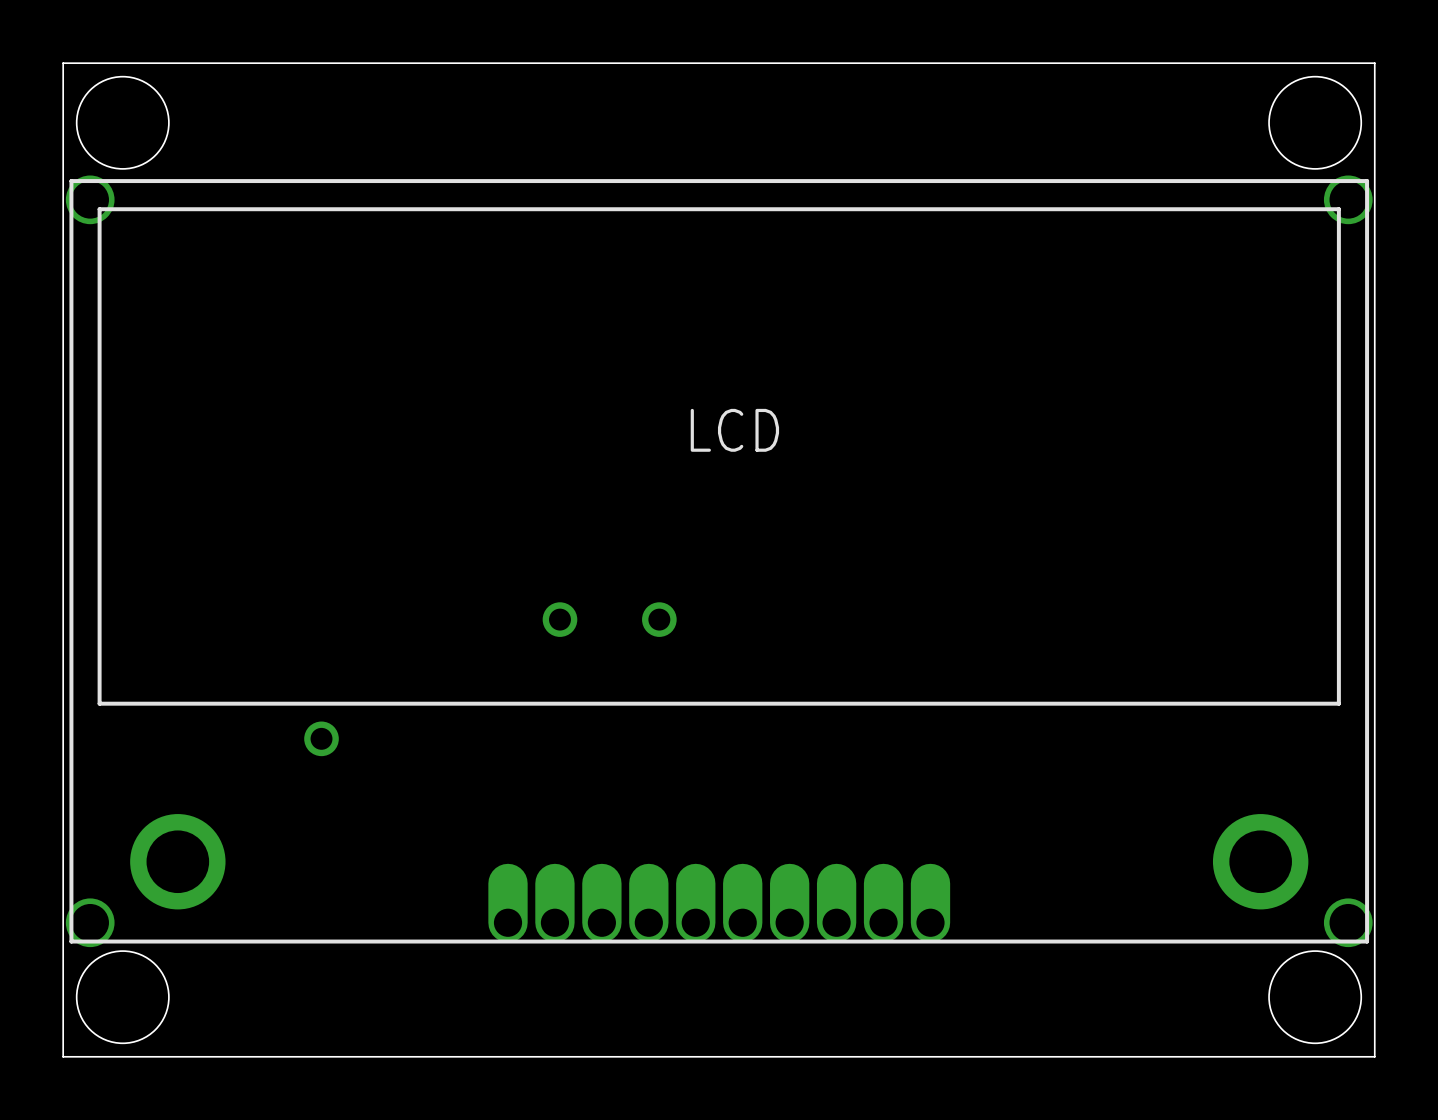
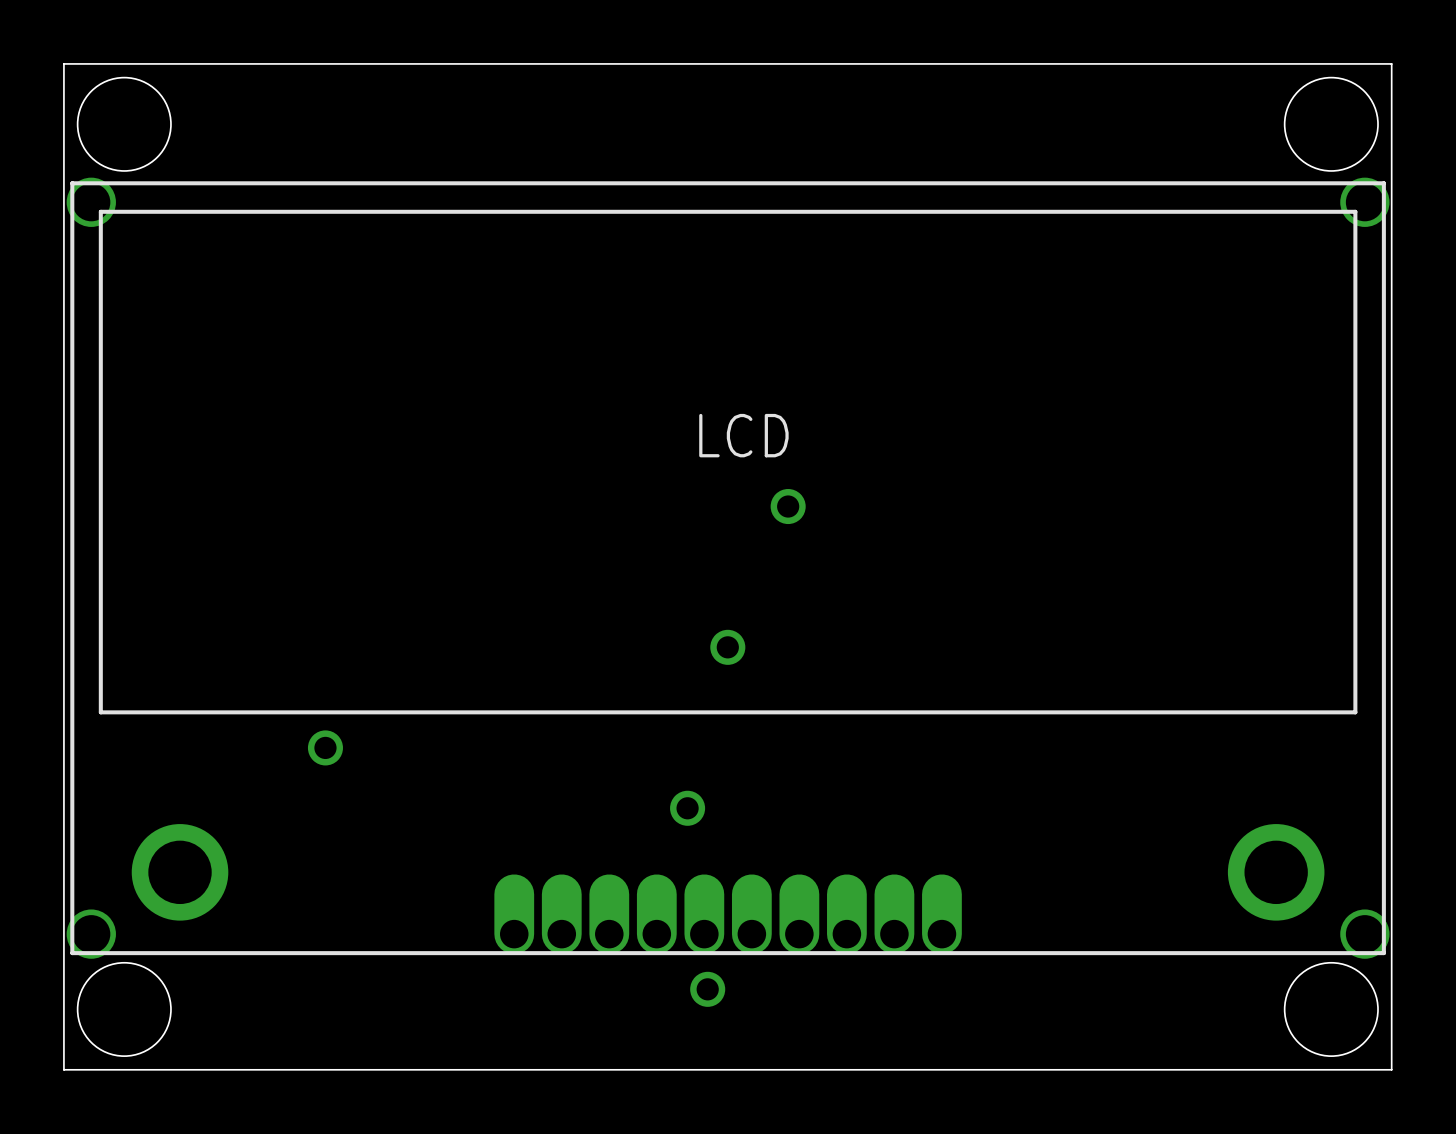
via: none -> (788, 506)
via: (559, 619) -> none
via position: (659, 619) -> (727, 647)
via: none -> (687, 808)
via: none -> (707, 989)

